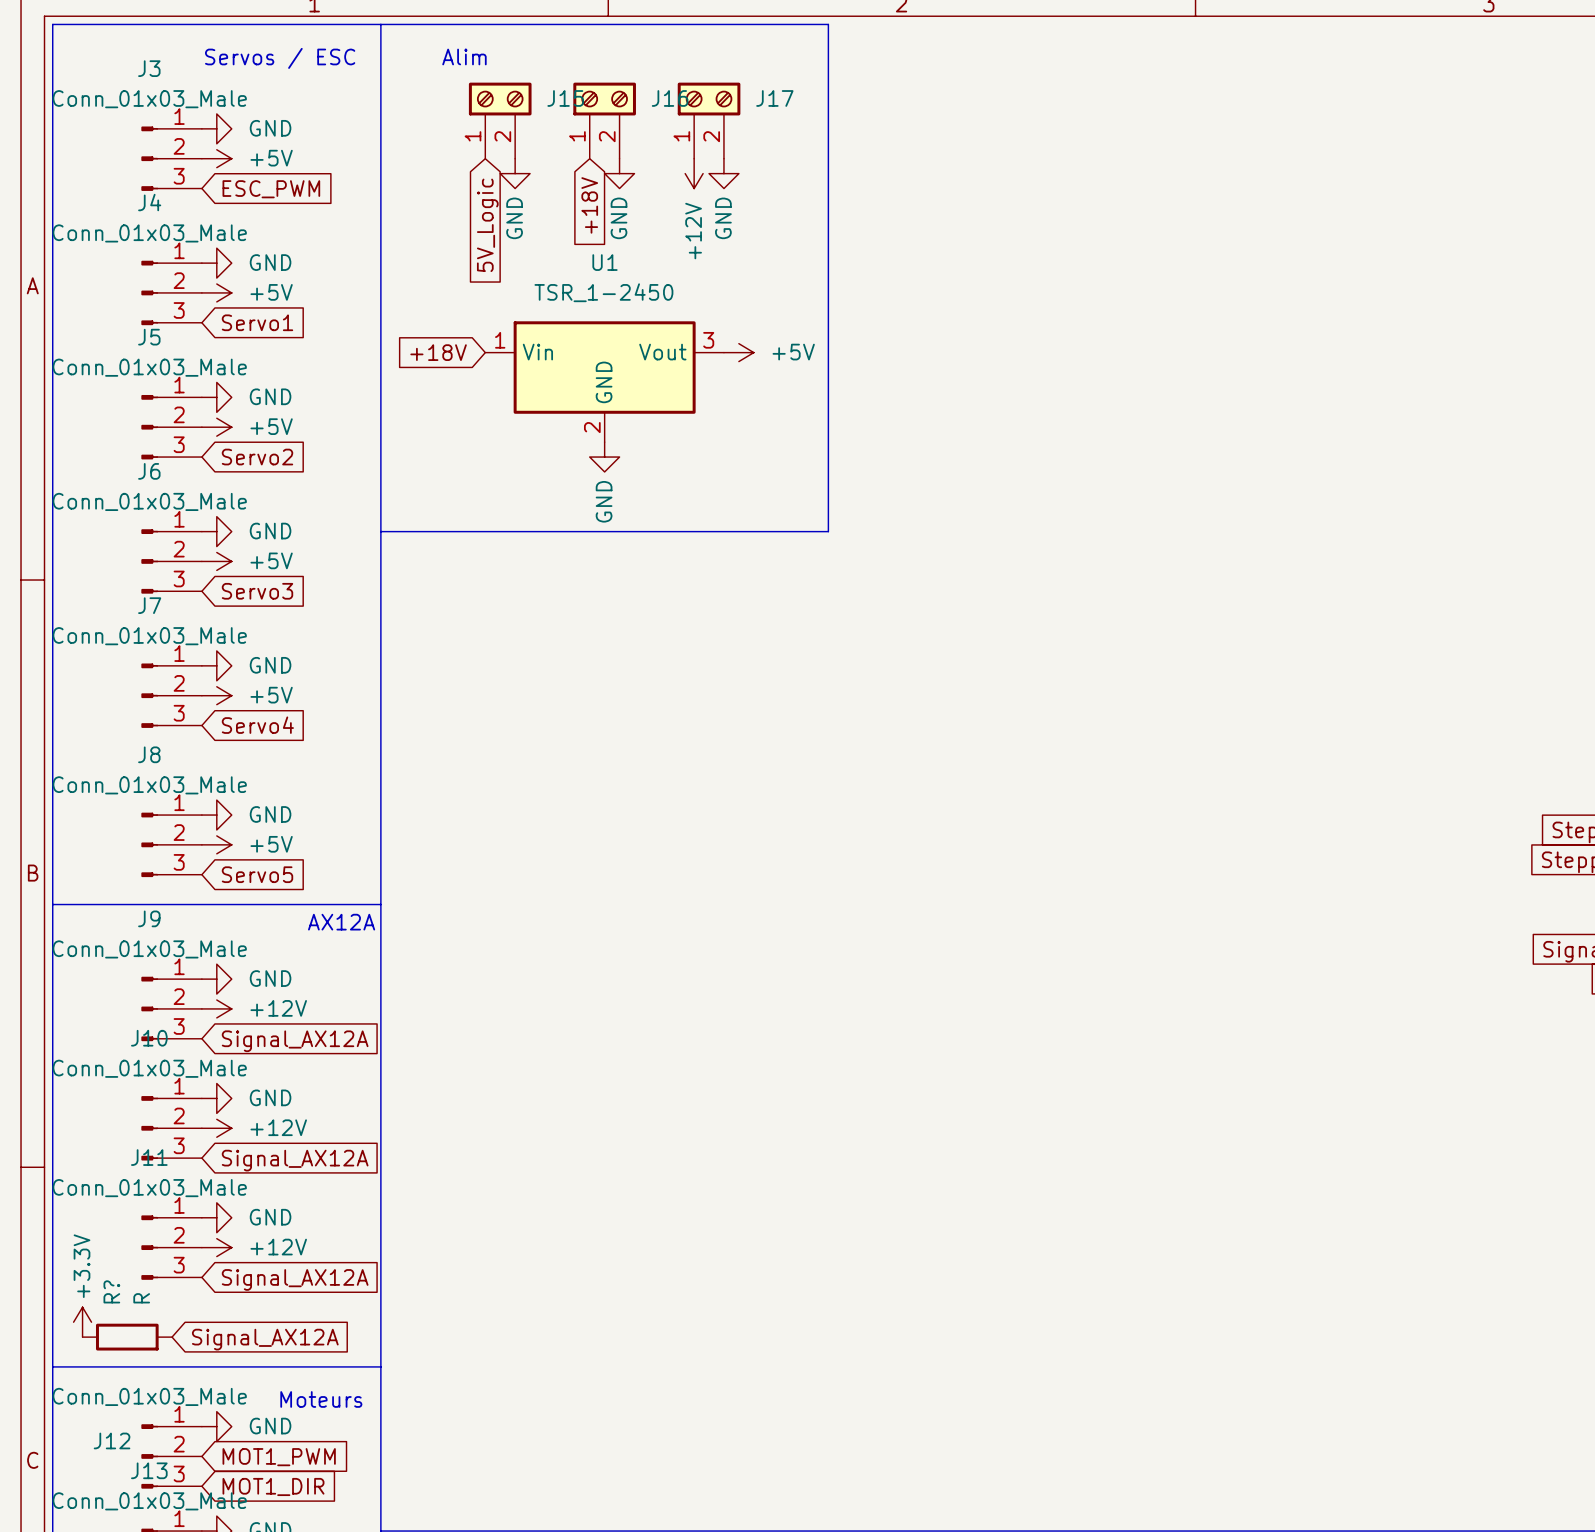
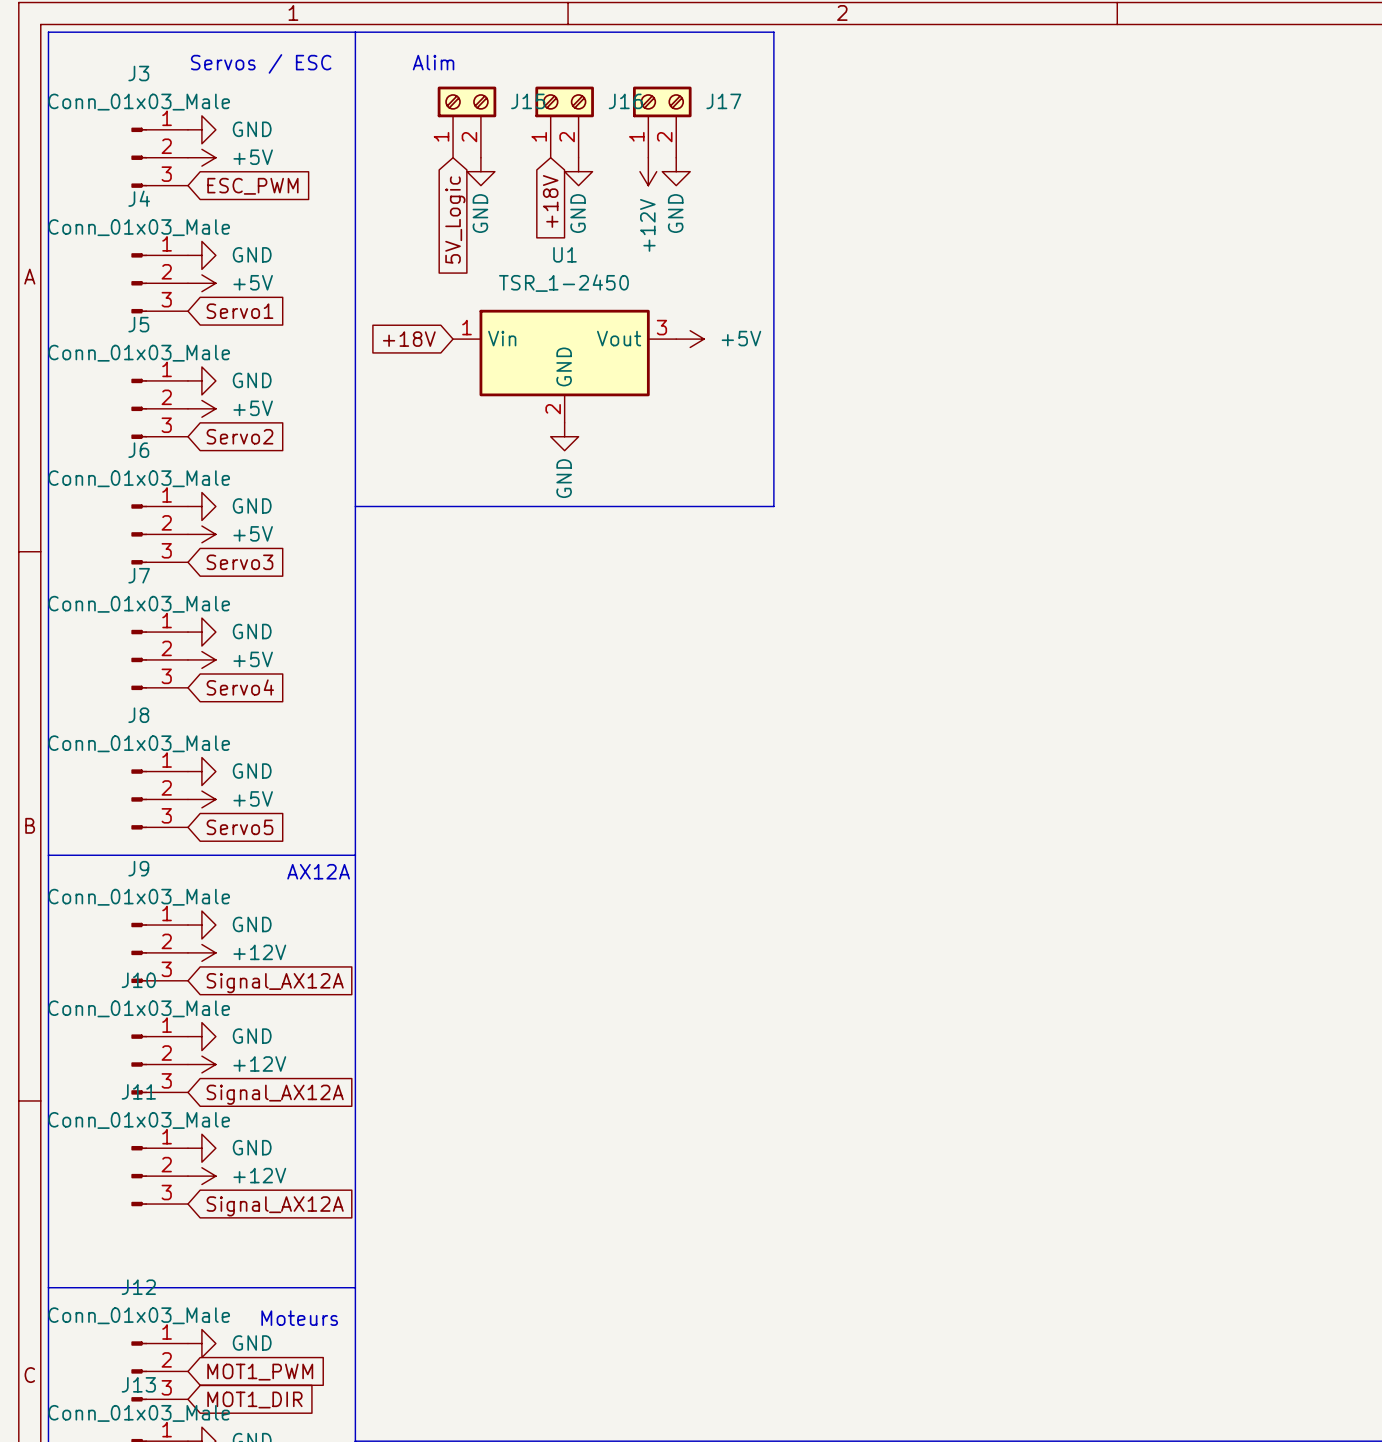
power symbol: +3.3V (82, 1322) -> none
R?: R (127, 1337) -> none
global label: Signal_AX12A (265, 1339) -> none
J12 name position: J12 (112, 1440) -> J12 (138, 1287)

